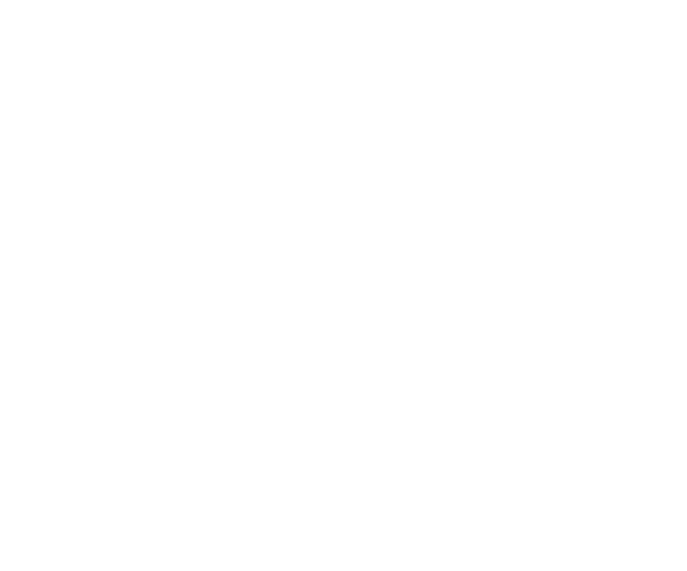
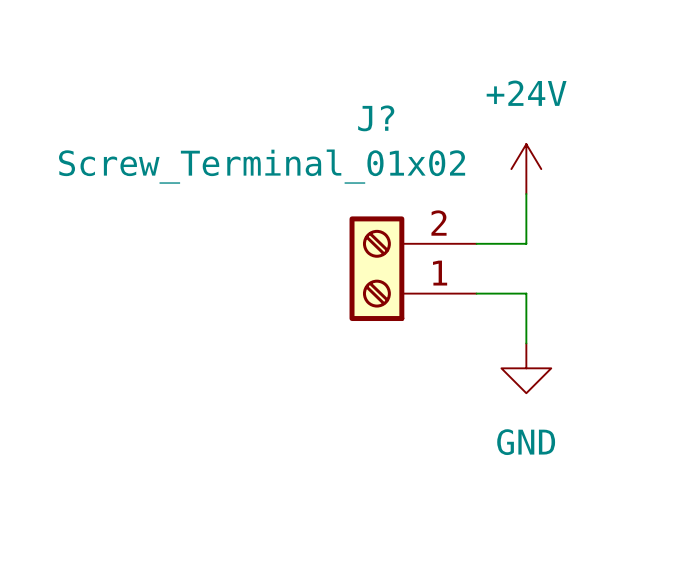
power symbol: none -> +24V (526, 169)
wire: none -> (526, 193) (526, 243) (476, 243)
J?: none -> Screw_Terminal_01x02 (413, 268)
wire: none -> (476, 293) (526, 293) (526, 343)
power symbol: none -> GND (526, 368)

